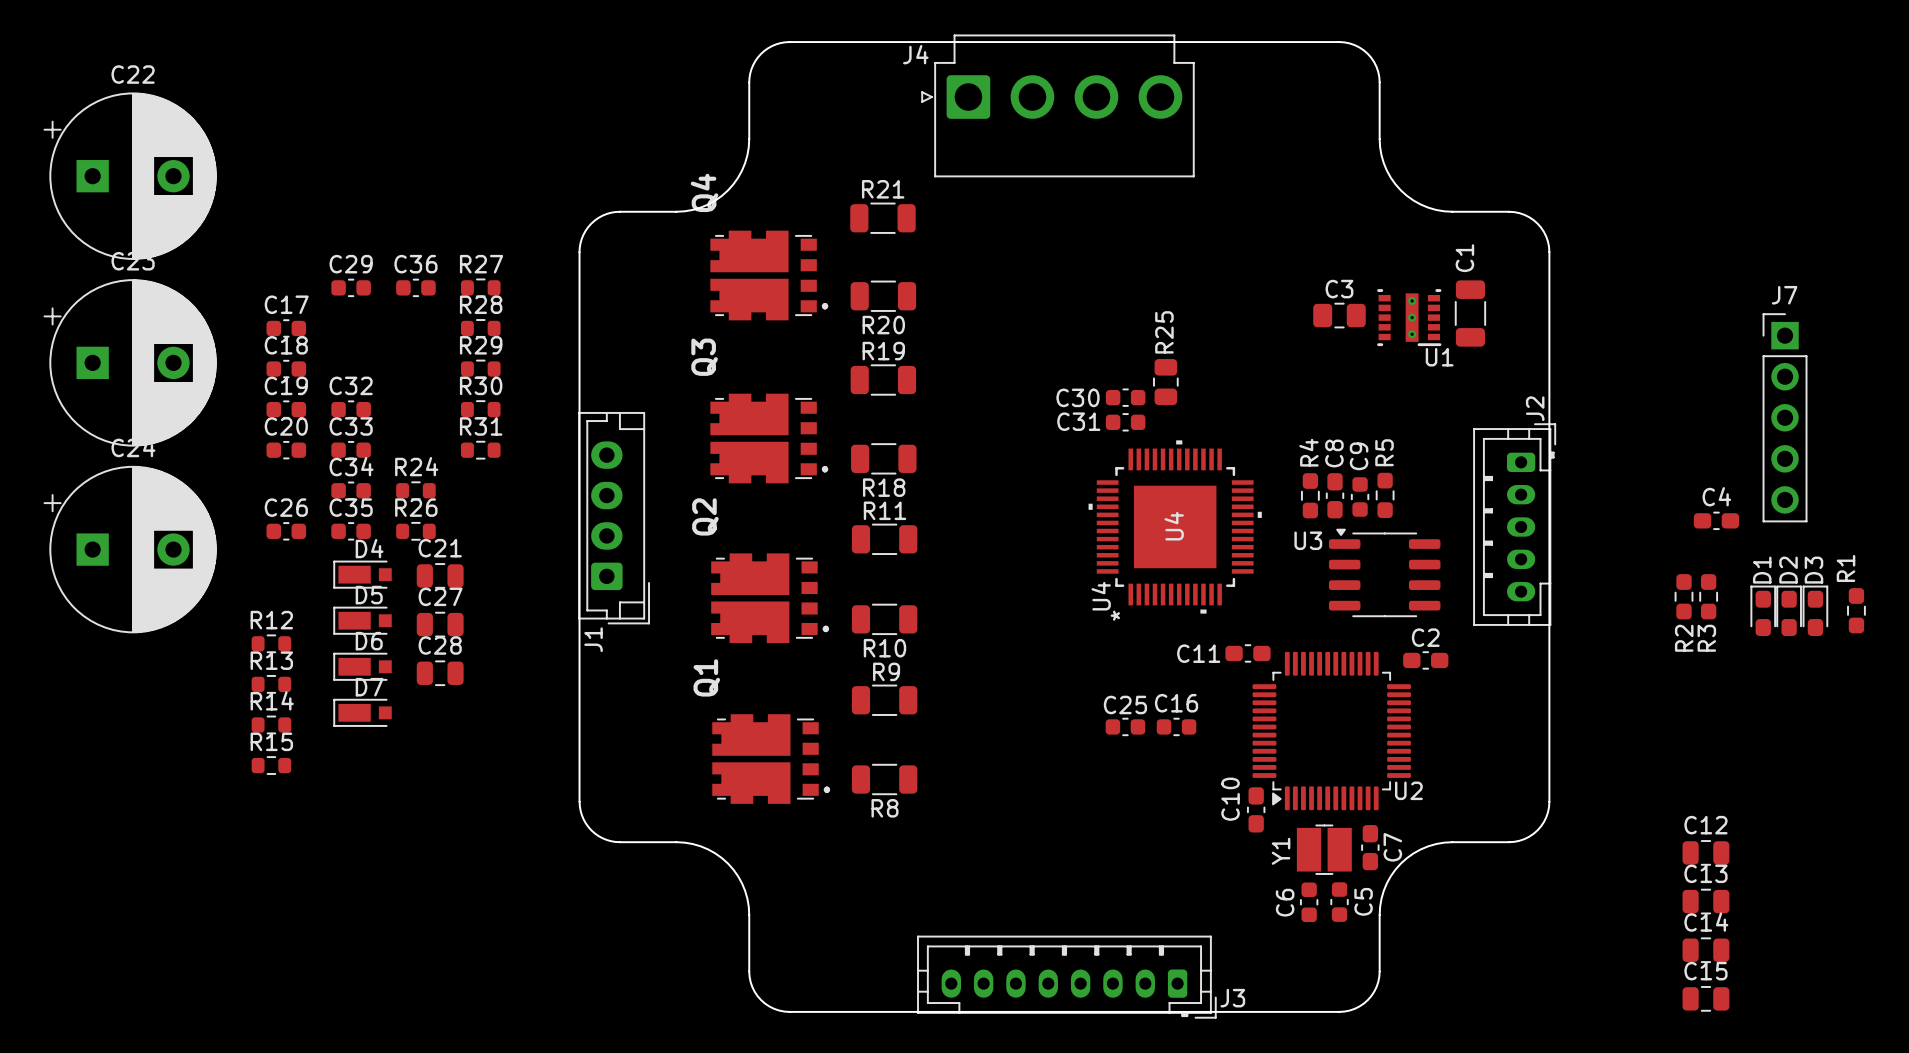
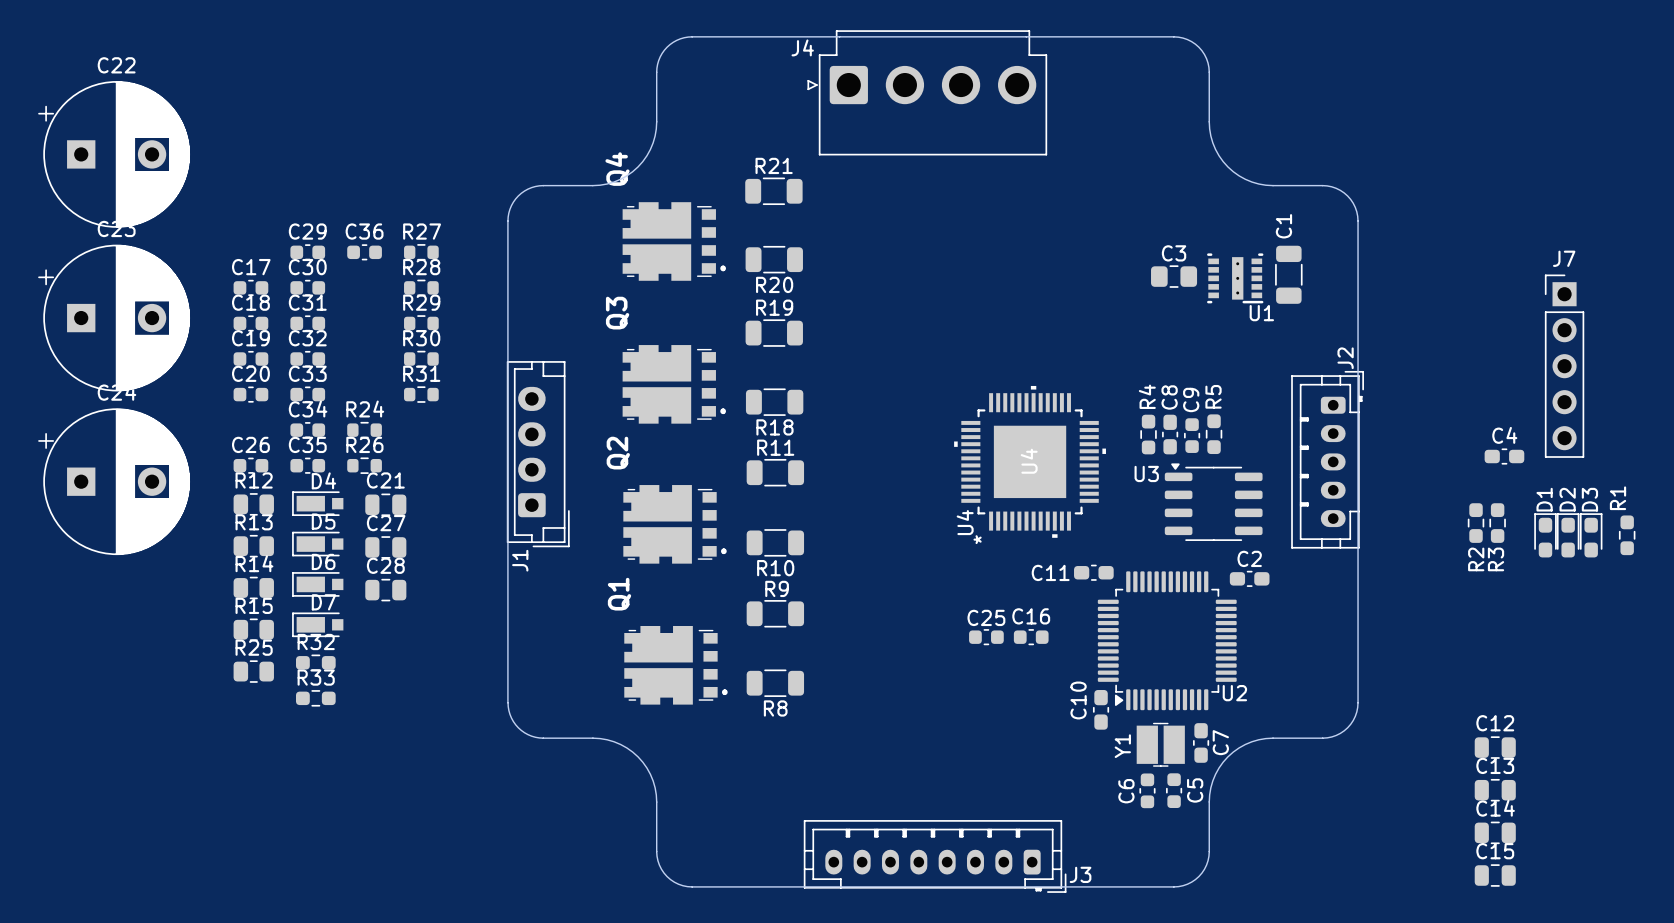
R25 rotation: 0° (1165, 382) -> 90° clockwise (253, 671)
R25 position: (1165, 382) -> (253, 671)
C30 name position: C30 (1078, 397) -> C30 (307, 267)
C30 position: (1125, 397) -> (307, 287)
C31 name position: C31 (1078, 421) -> C31 (307, 302)
C31 position: (1125, 422) -> (307, 323)
R12 footprint: [251, 634, 292, 654] -> [233, 493, 274, 516]
R13 footprint: [251, 674, 292, 694] -> [233, 534, 274, 558]
R14 footprint: [251, 715, 292, 735] -> [233, 576, 274, 600]
R15 footprint: [251, 756, 292, 775] -> [233, 618, 274, 642]
R32: none -> (315, 662)
R33: none -> (315, 698)

